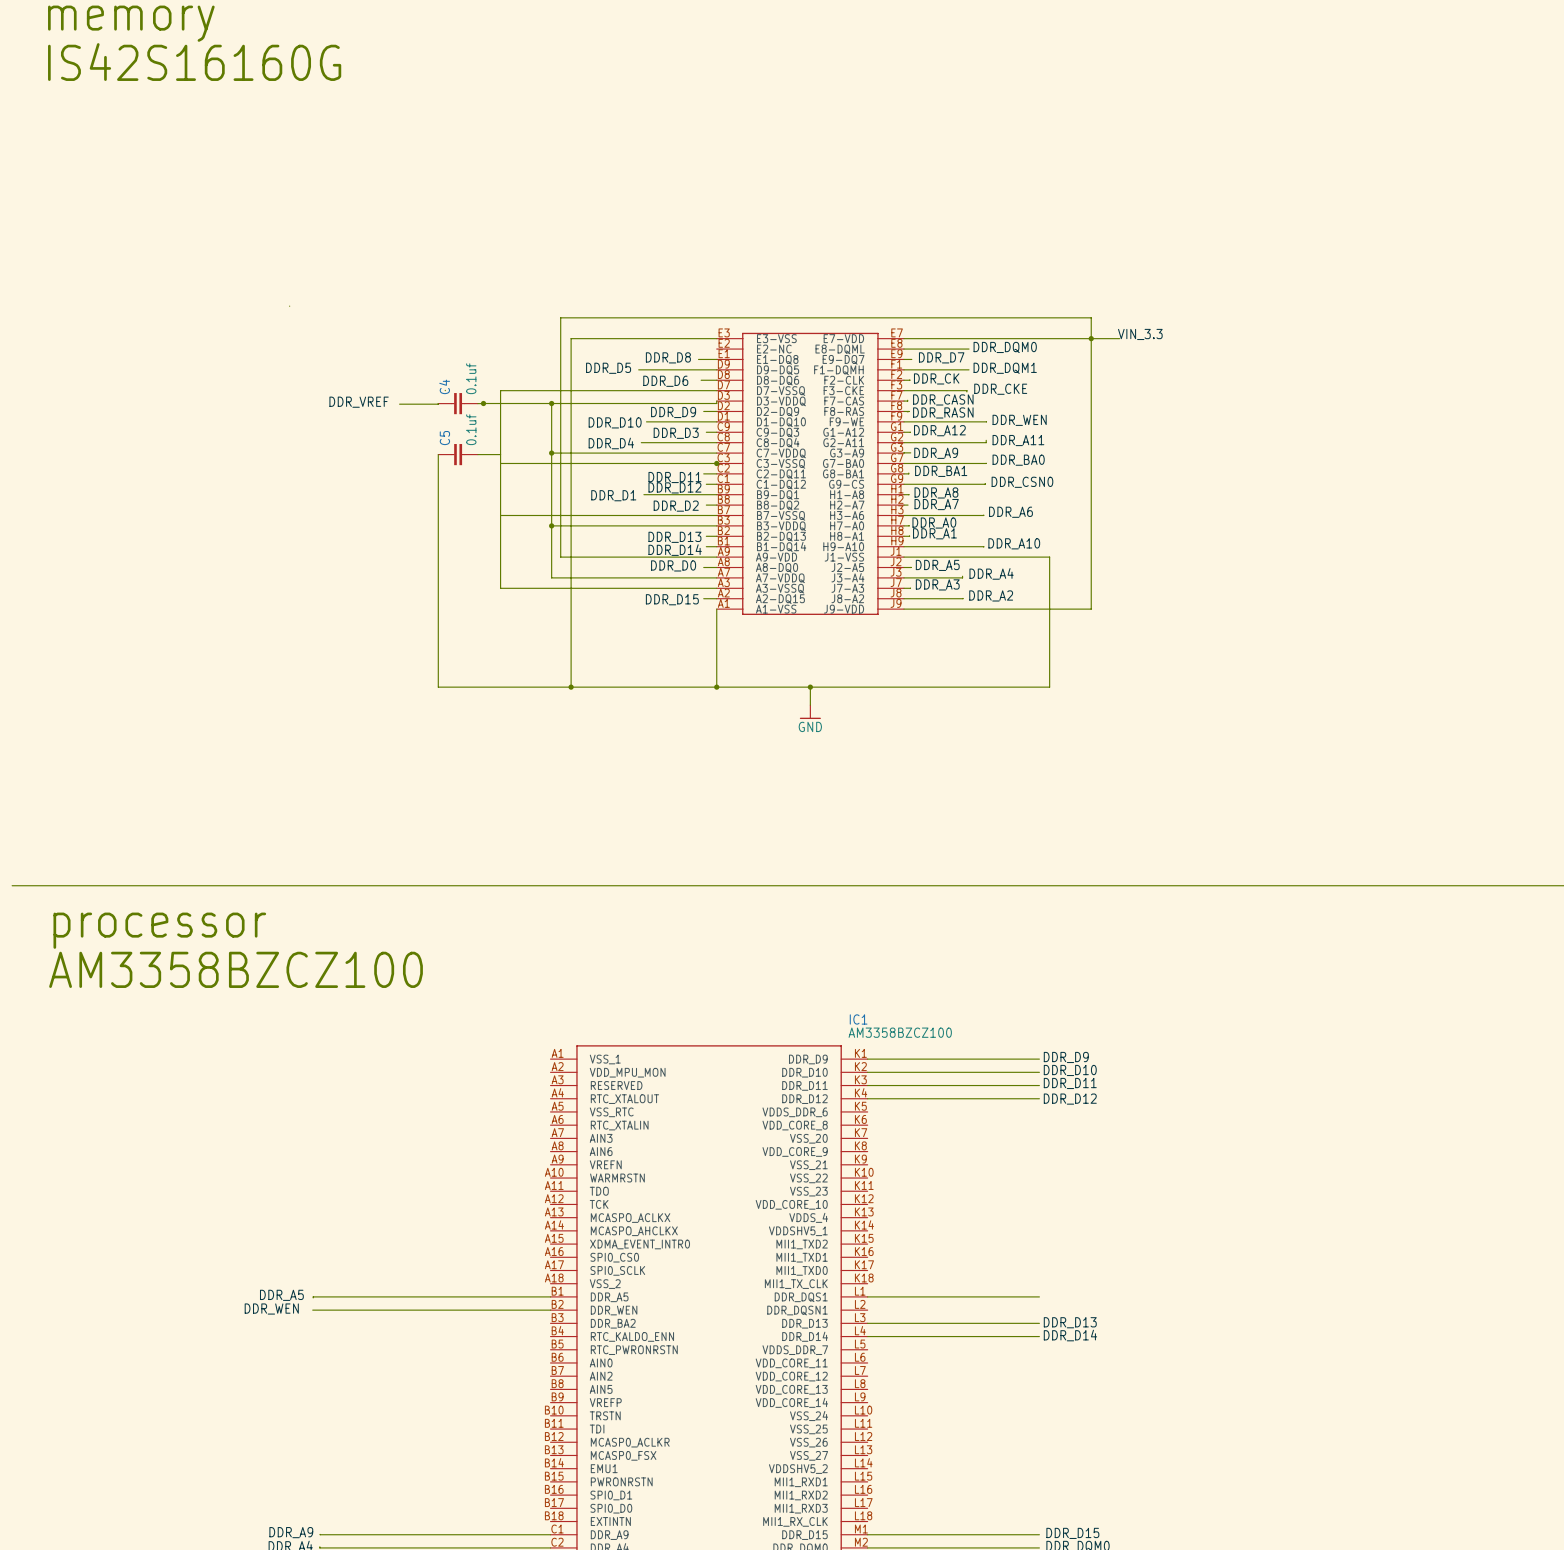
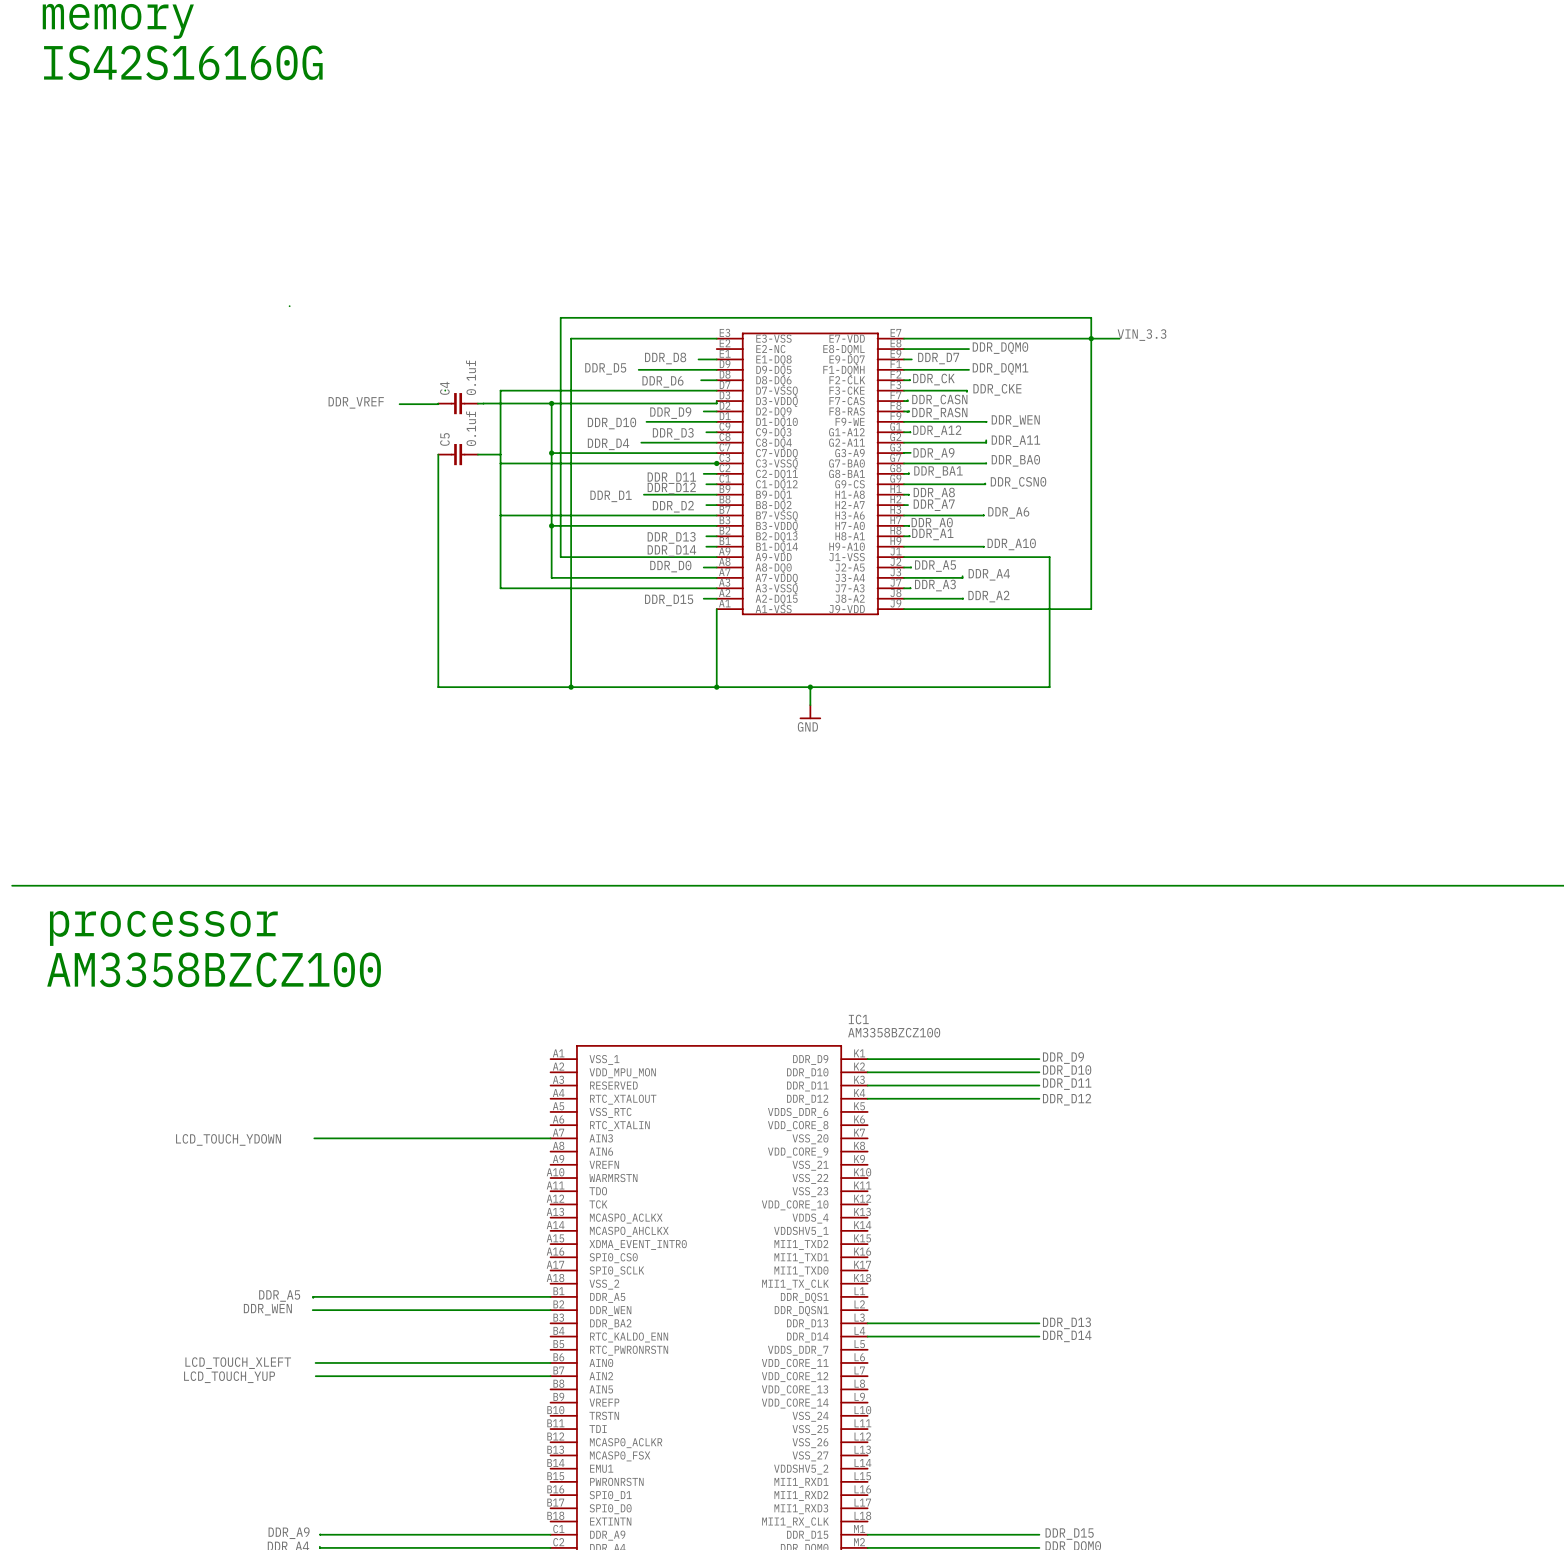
junction: (483, 403) -> none
wire: none -> (314, 1138) (550, 1138)
label: none -> LCD_TOUCH_YDOWN (228, 1139)
wire: (867, 1296) (1039, 1296) -> none
label: none -> LCD_TOUCH_XLEFT (238, 1363)
wire: none -> (315, 1362) (550, 1362)
label: none -> LCD_TOUCH_YUP (229, 1377)
wire: none -> (315, 1376) (550, 1376)

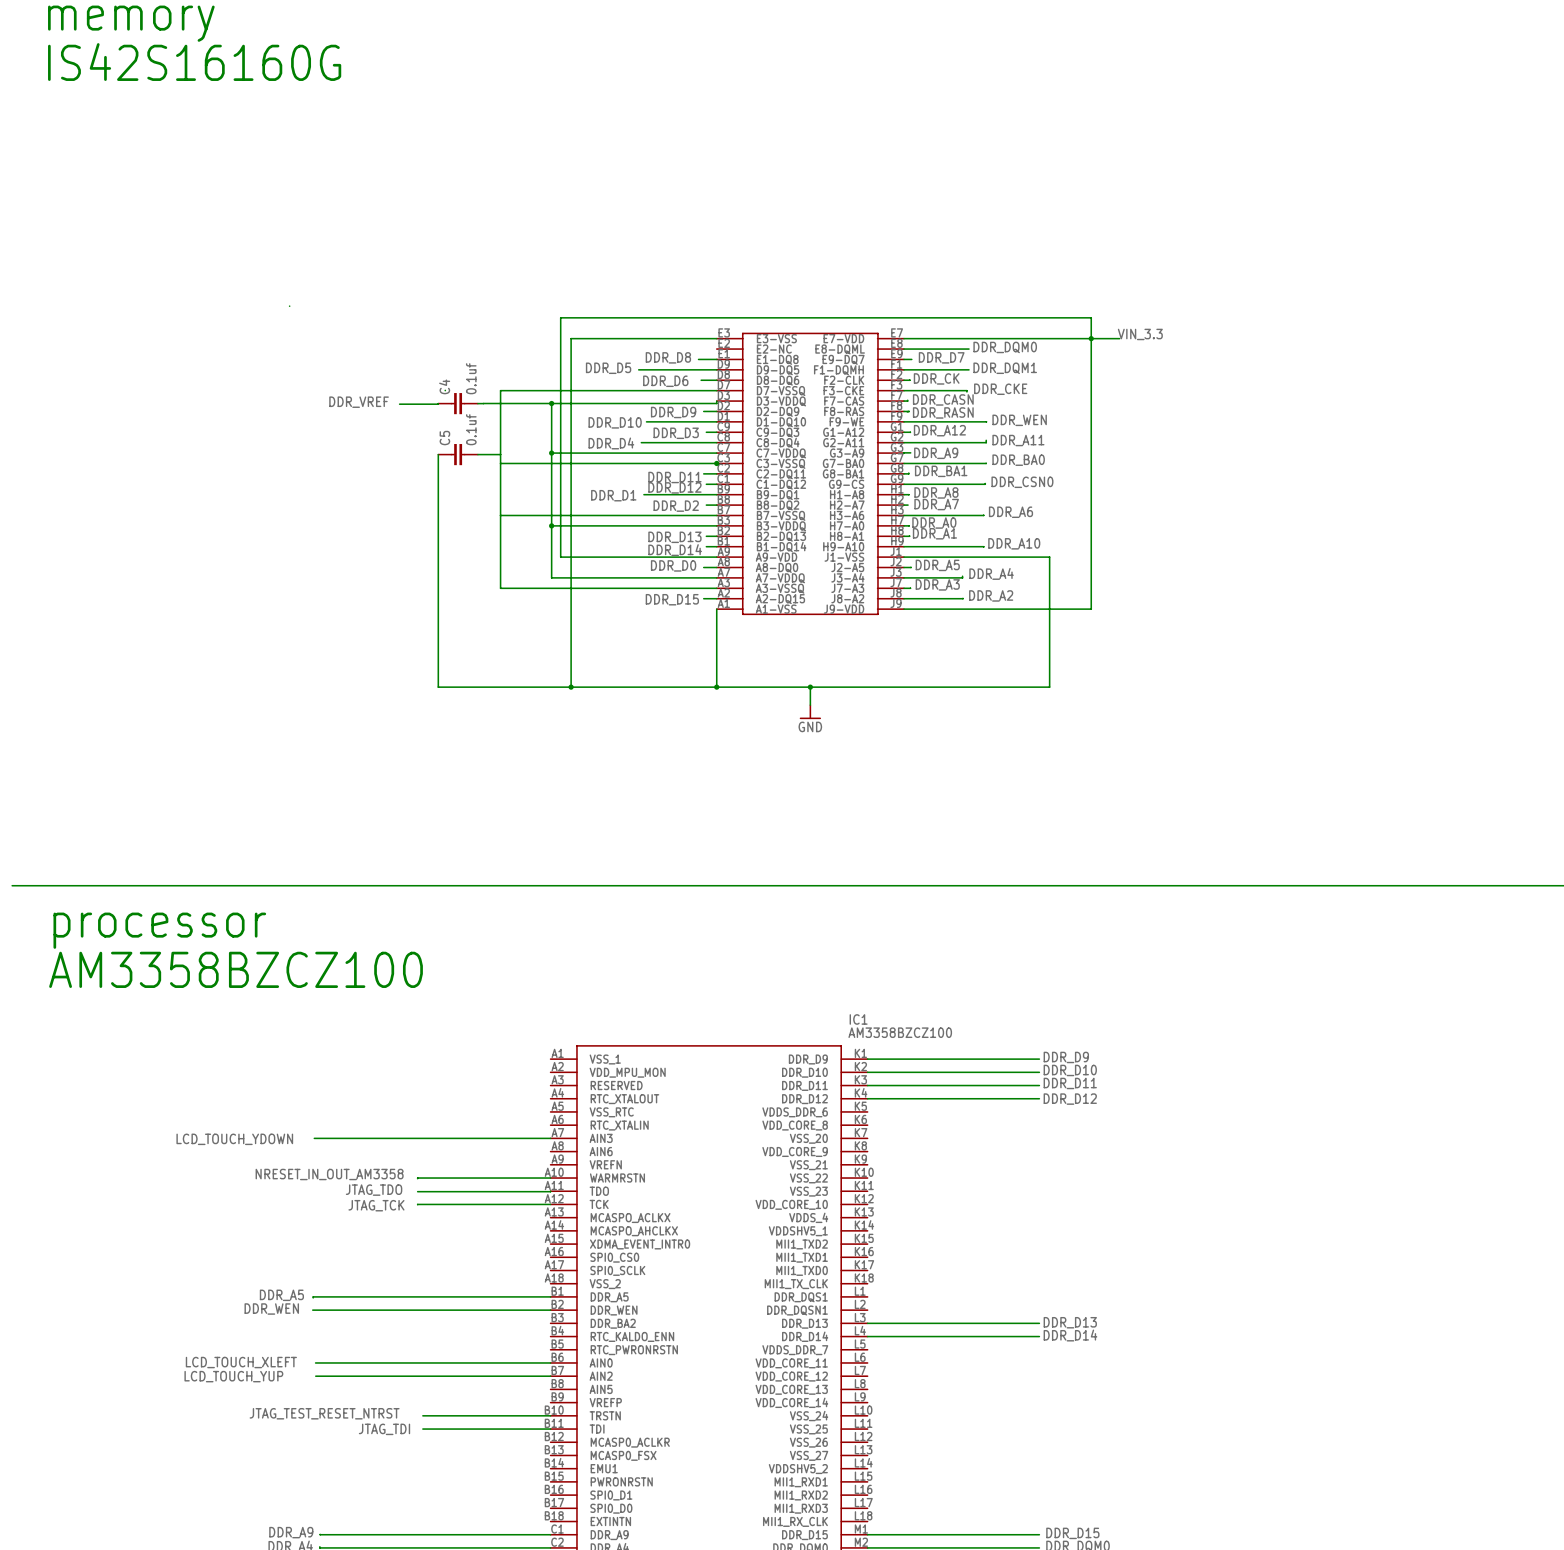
label: none -> NRESET_IN_OUT_AM3358 (329, 1174)
wire: none -> (550, 1178) (417, 1178)
label: none -> JTAG_TDO (374, 1190)
wire: none -> (550, 1191) (417, 1191)
wire: none -> (550, 1204) (417, 1204)
label: none -> JTAG_TCK (376, 1205)
label: none -> JTAG_TEST_RESET_NTRST (324, 1413)
wire: none -> (422, 1415) (550, 1415)
label: none -> JTAG_TDI (384, 1429)
wire: none -> (422, 1429) (550, 1429)

